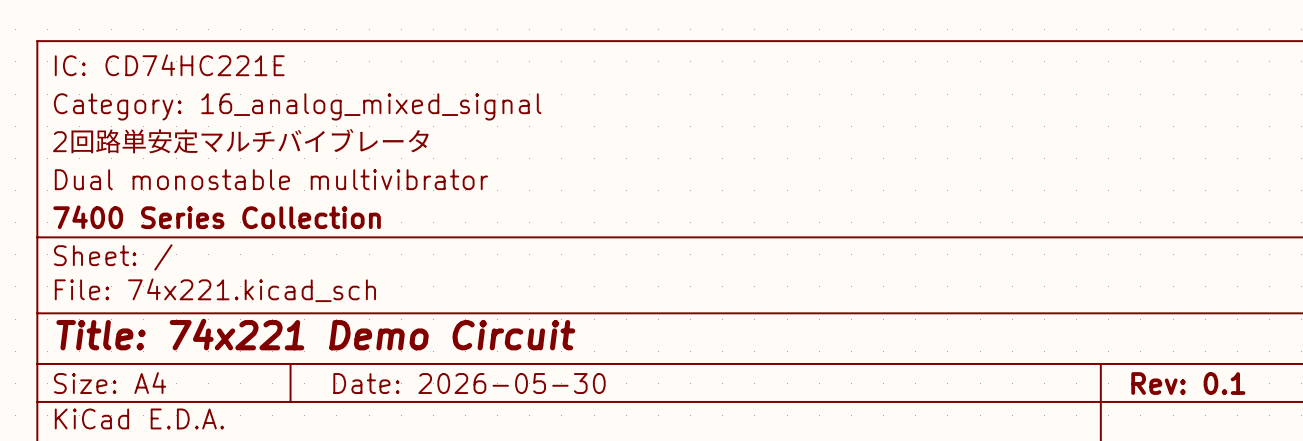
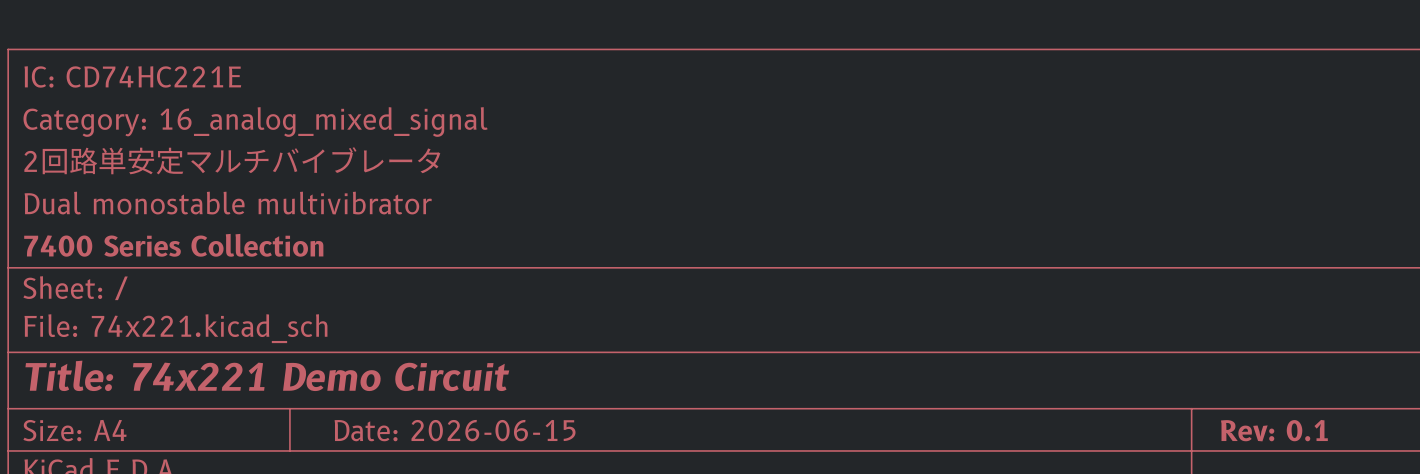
title block: Date: 2026-05-30 (469, 383) -> Date: 2026-06-15 (455, 430)

